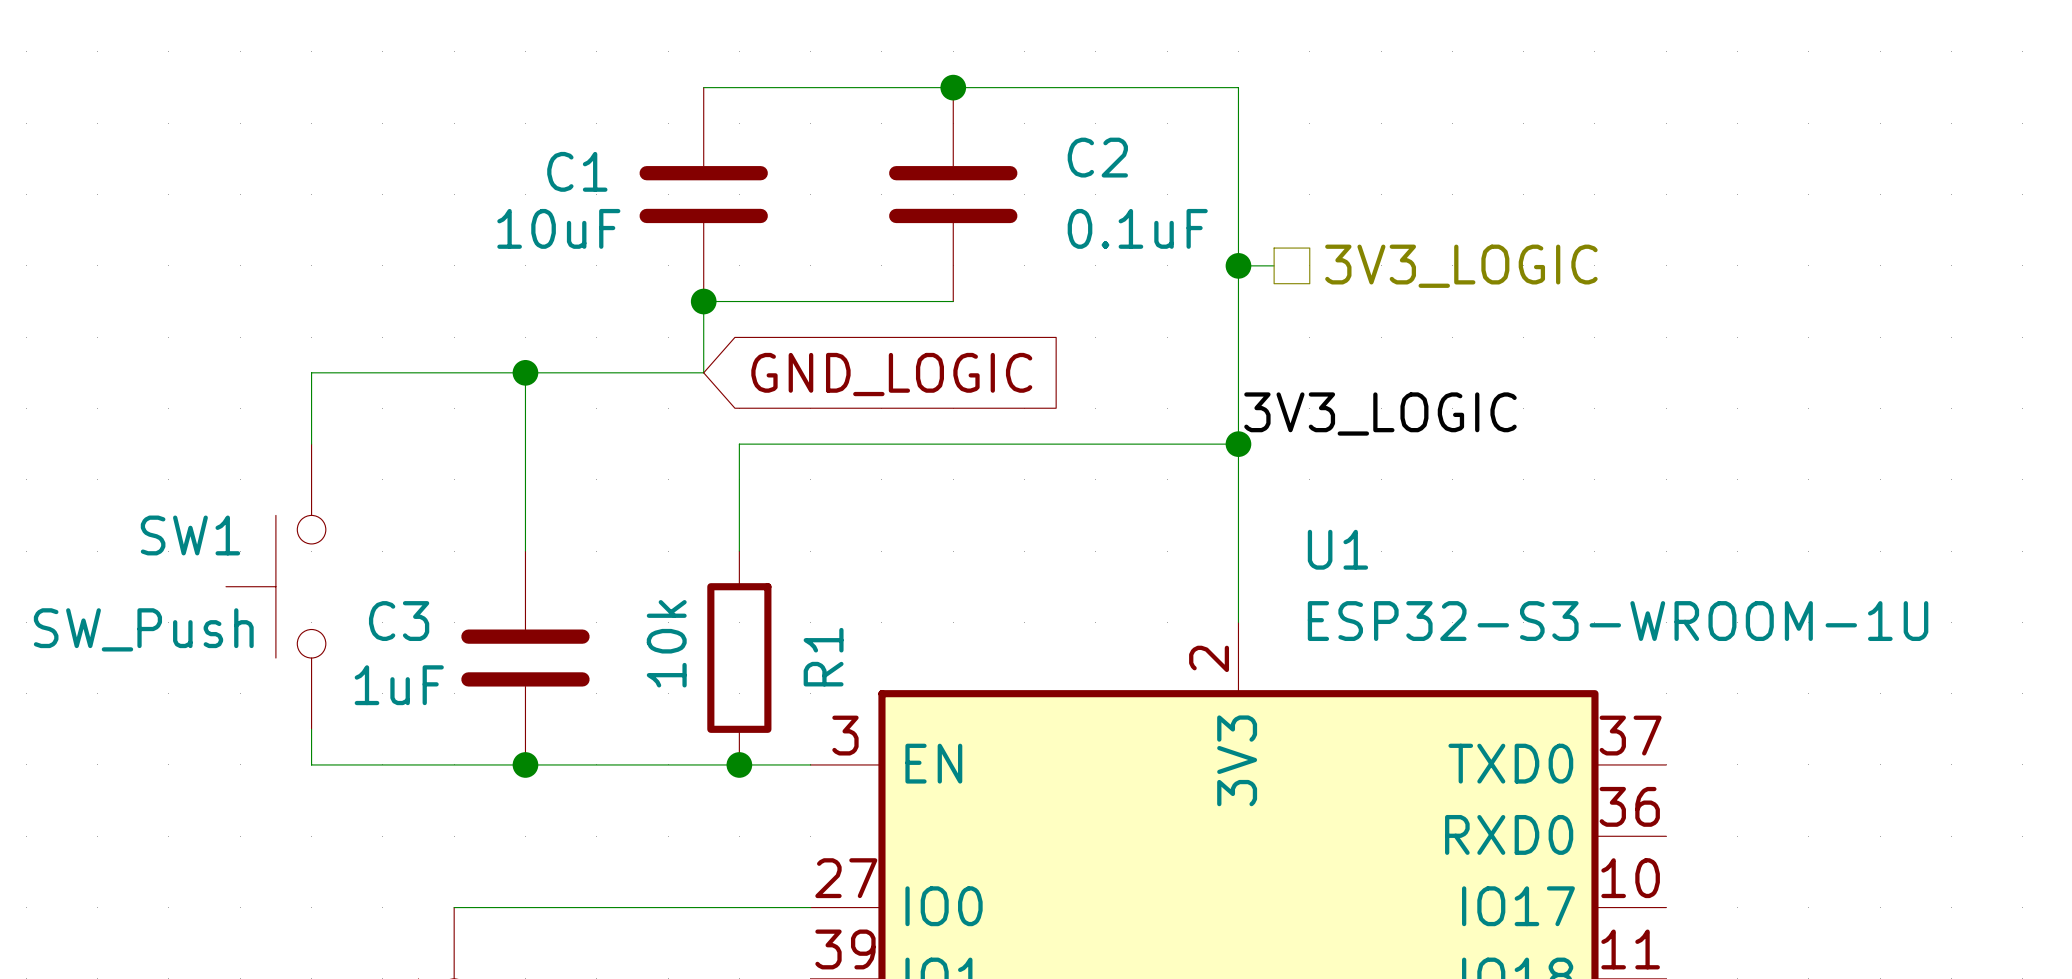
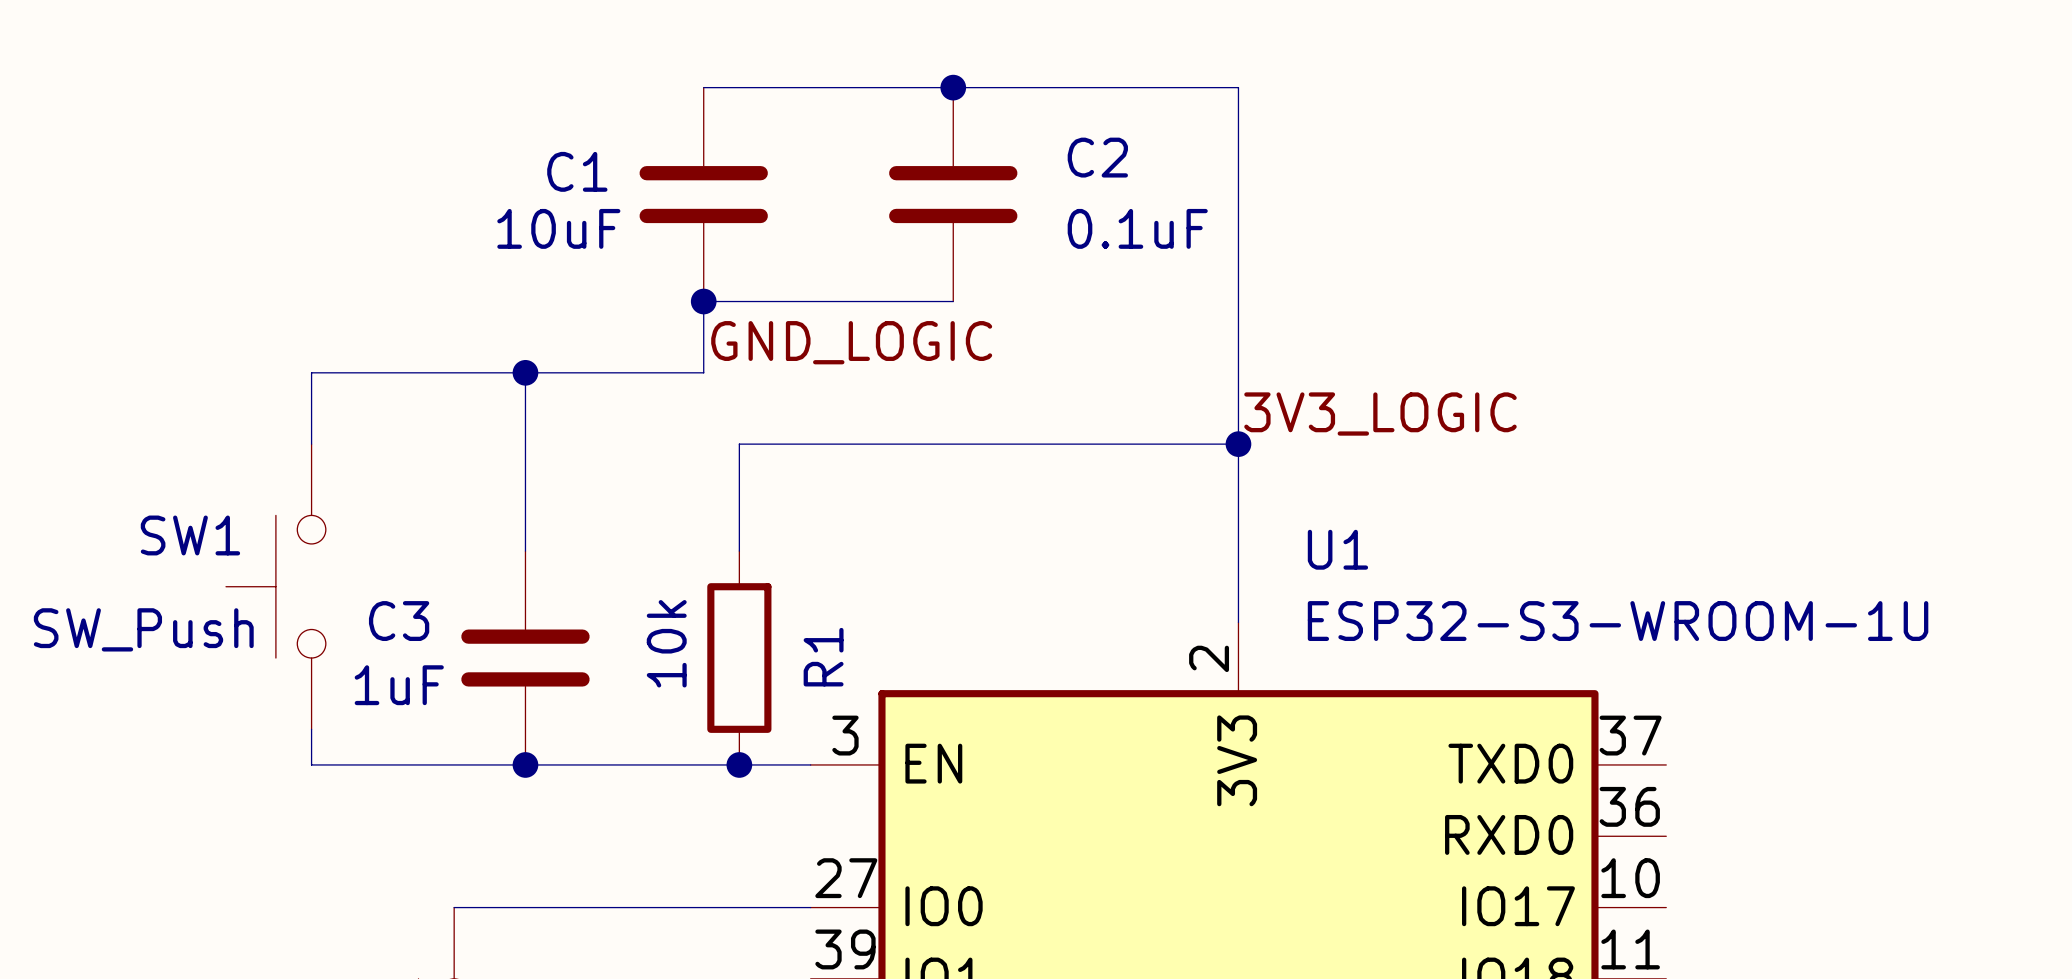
wire: (1238, 265) (1274, 265) -> none
junction: (1238, 265) -> none
hierarchical label: 3V3_LOGIC (1461, 266) -> none
label: none -> GND_LOGIC (851, 342)
global label: GND_LOGIC (891, 374) -> none

